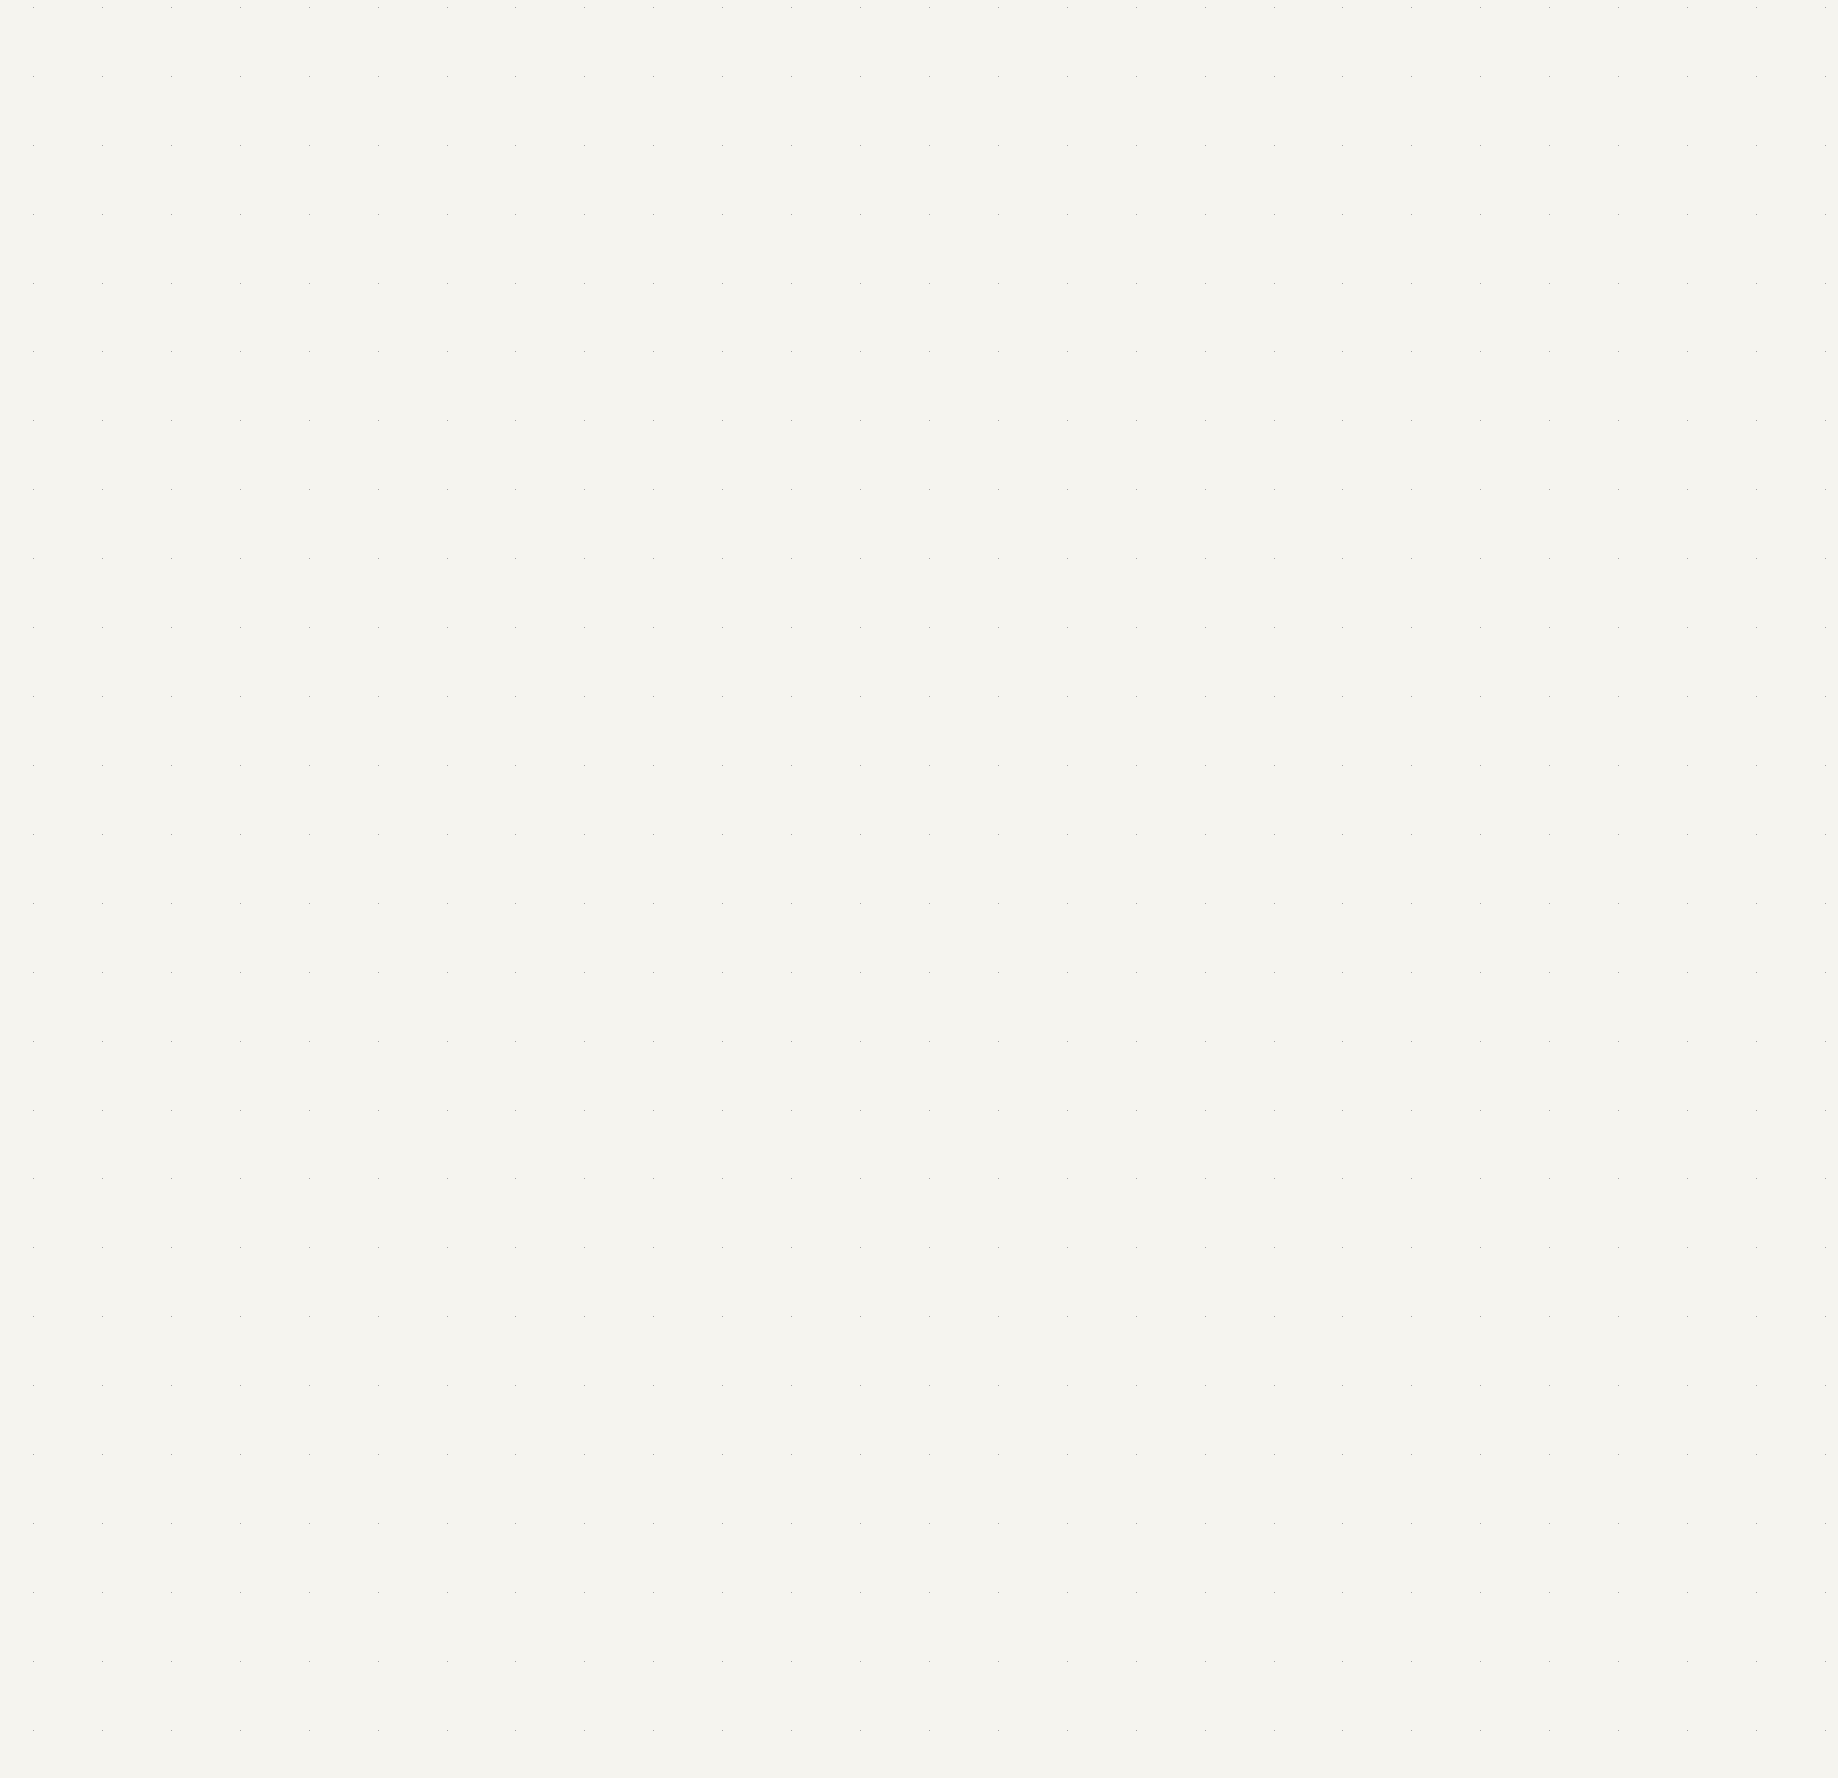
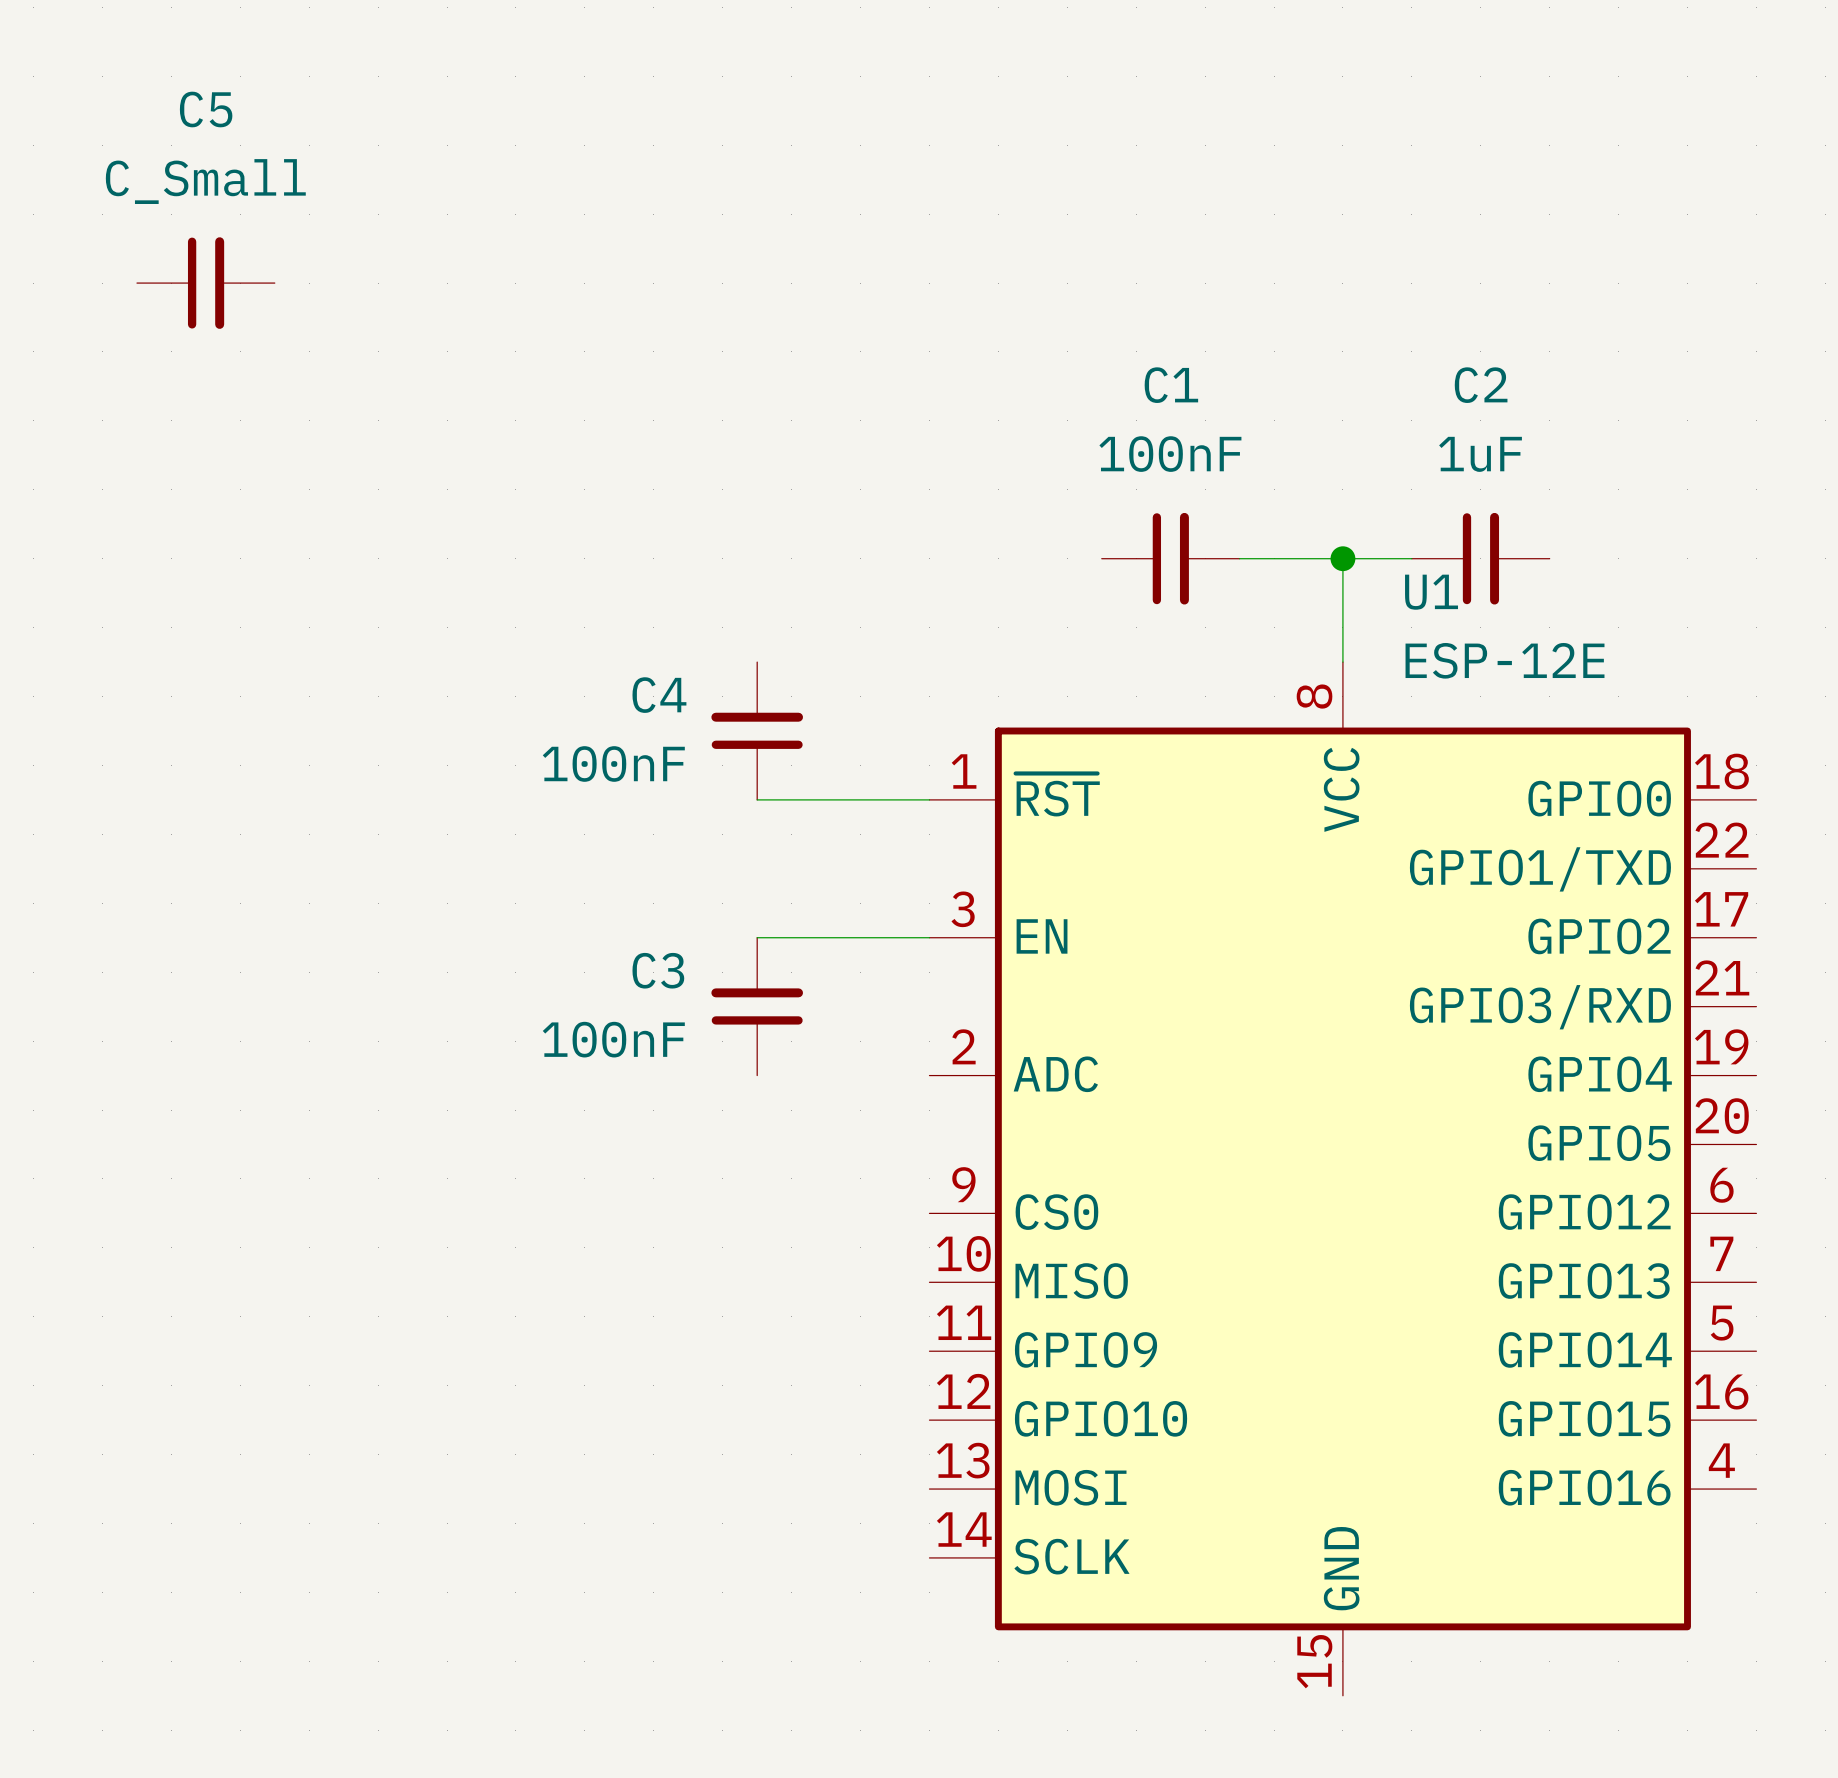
C5: none -> C_Small (205, 283)
C1: none -> 100nF (1170, 558)
wire: none -> (1239, 558) (1411, 558)
wire: none -> (1342, 558) (1342, 662)
junction: none -> (1342, 558)
C2: none -> 1uF (1480, 558)
C4: none -> 100nF (757, 731)
wire: none -> (757, 799) (929, 799)
wire: none -> (757, 937) (929, 937)
C3: none -> 100nF (757, 1006)
U1: none -> ESP-12E (1342, 1178)

